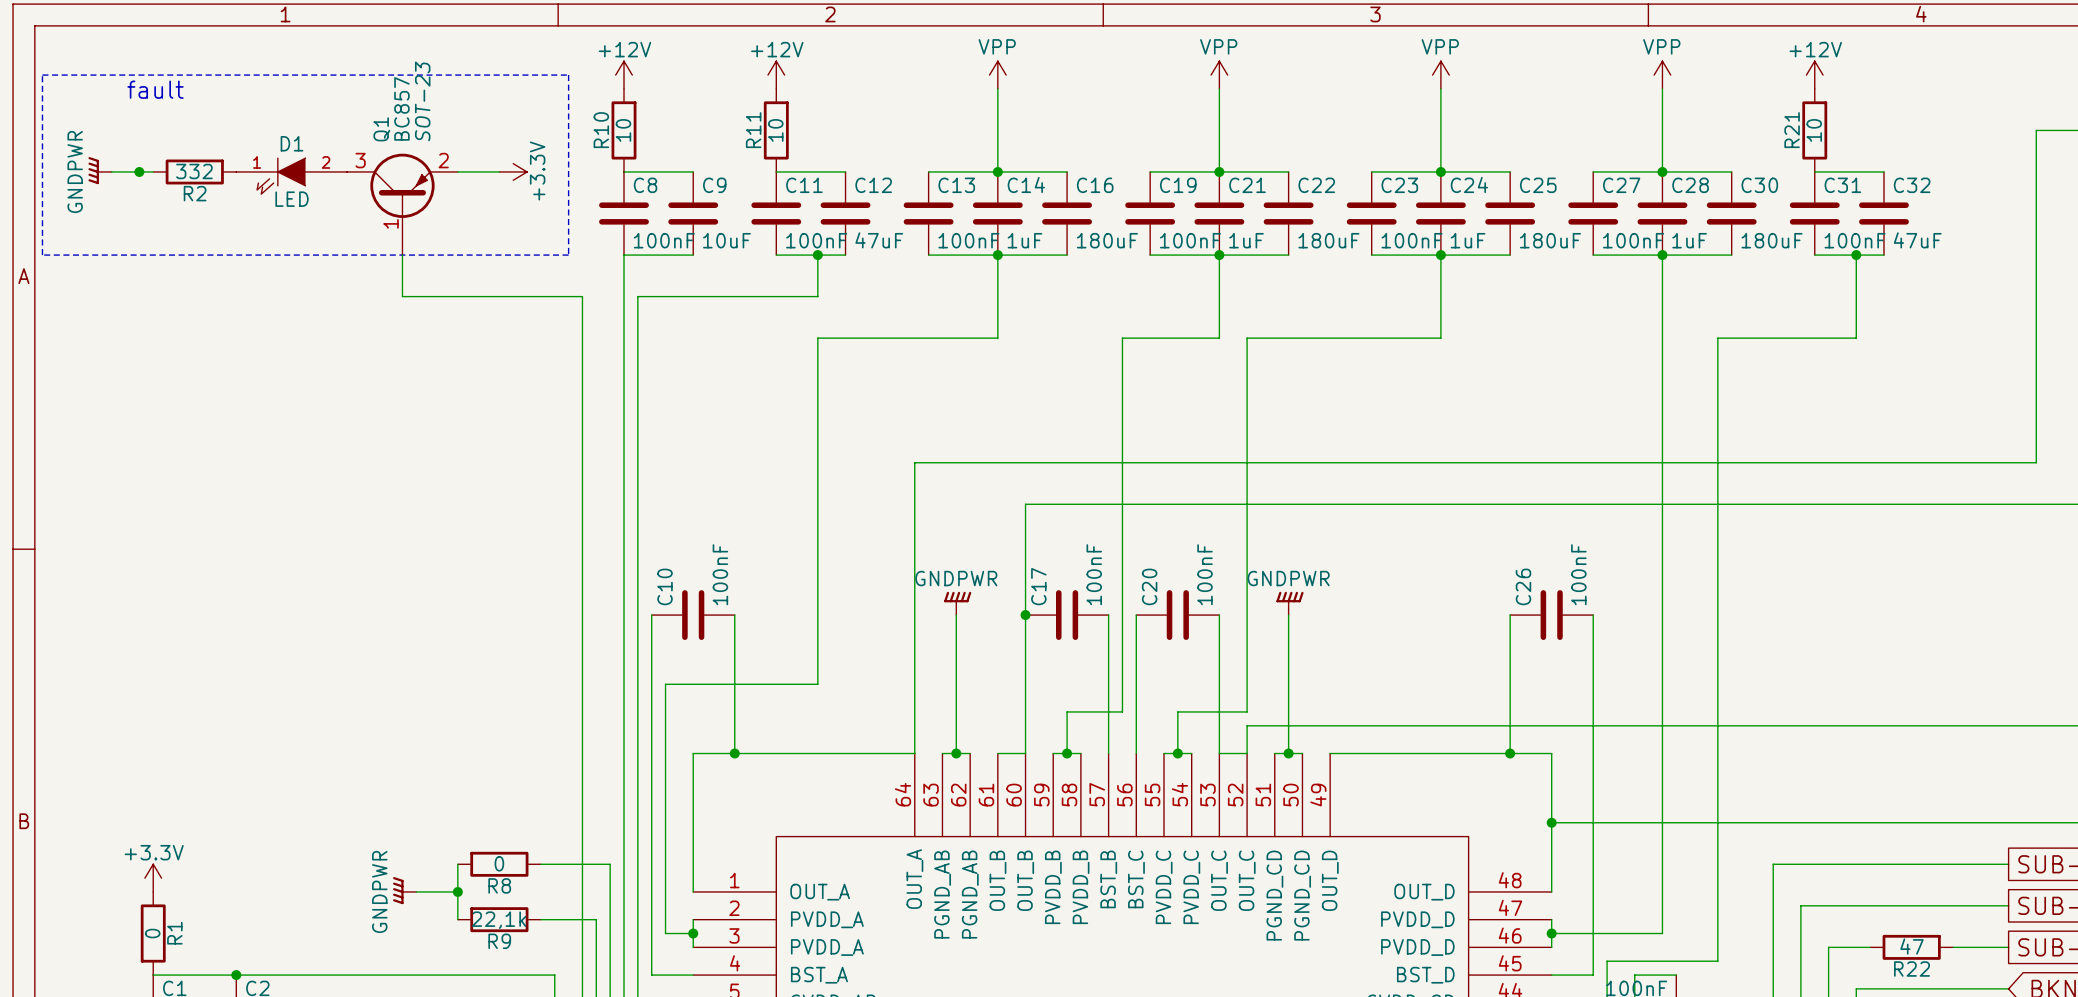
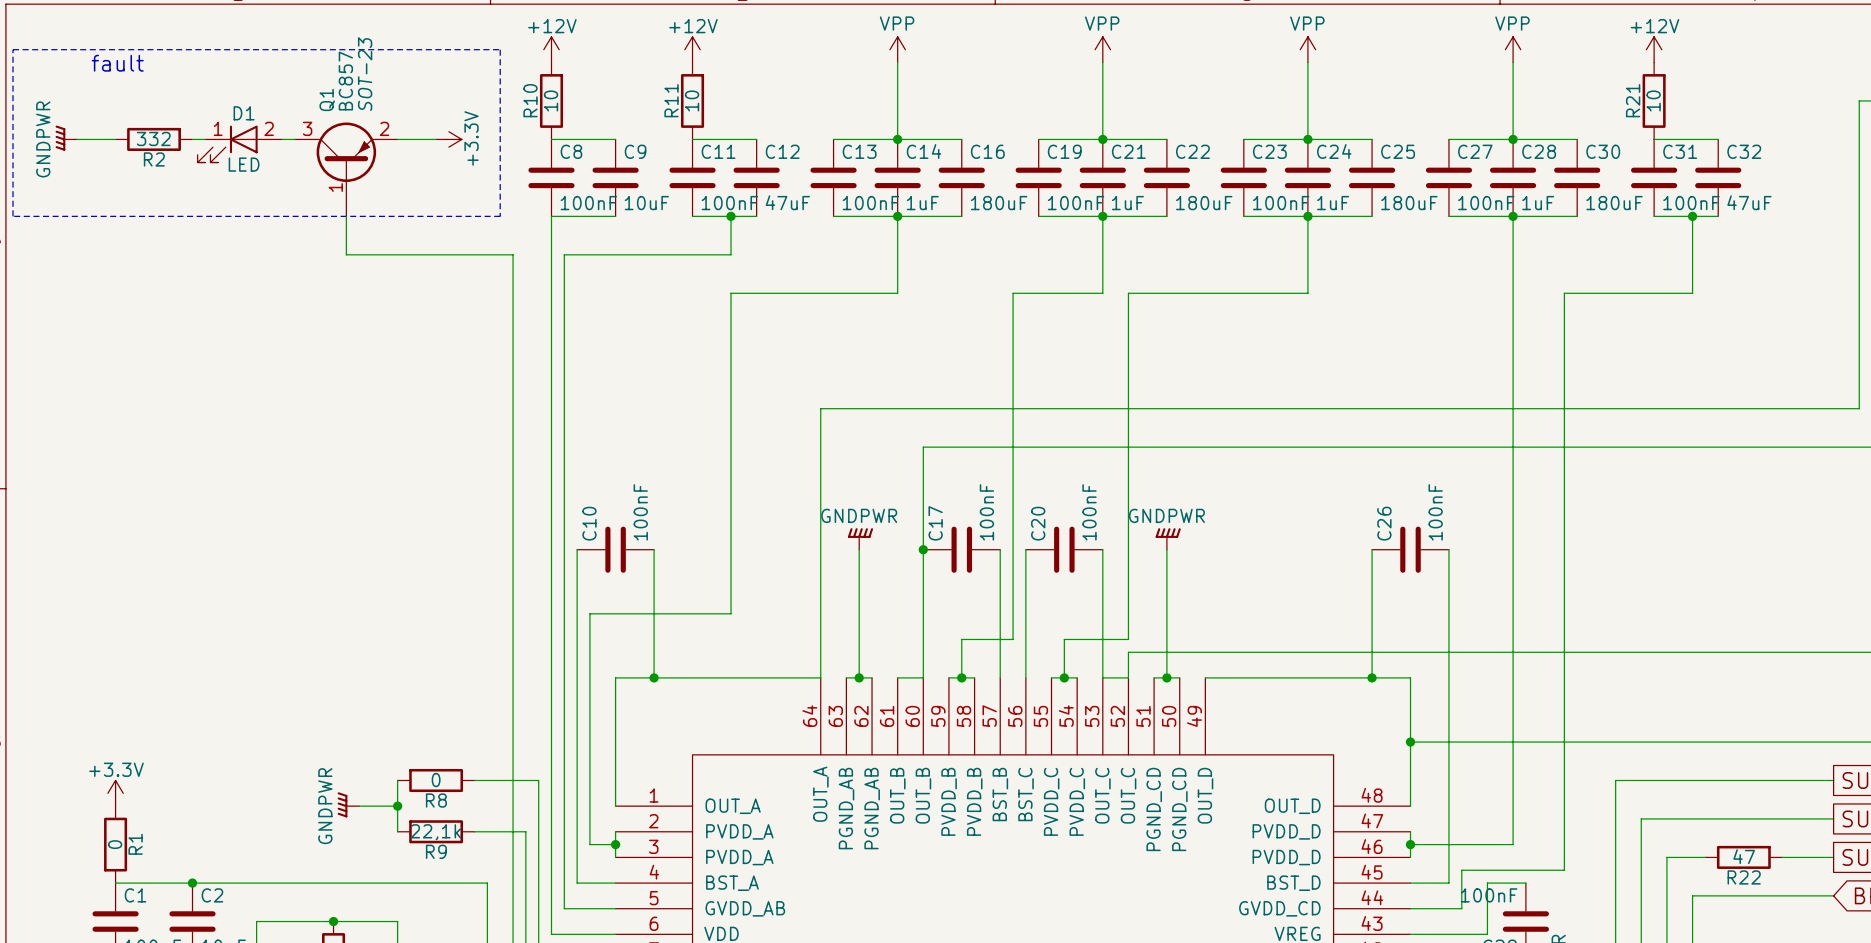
D1 symbol: [236, 158, 348, 195] -> [197, 125, 283, 163]
junction: (139, 171) -> none

